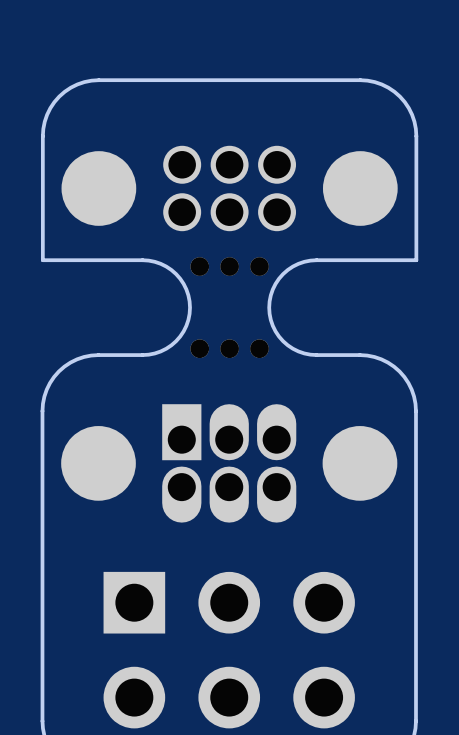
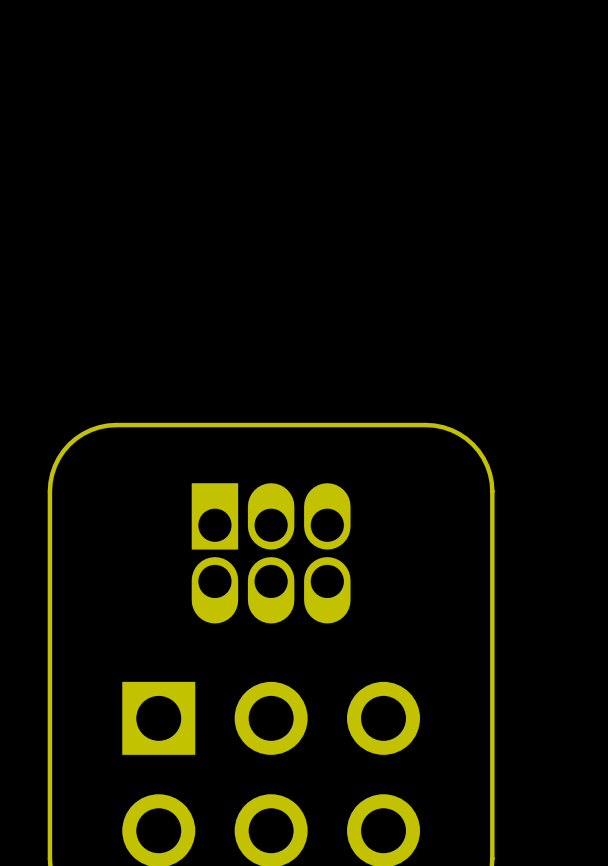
part: (98, 188) -> none
part: (229, 188) -> none
part: (360, 188) -> none
part: (229, 307) -> none
board edge: (316, 355) (304, 353) (287, 345) (279, 336) (272, 325) (269, 313) (269, 301) (275, 283) (283, 274) (292, 266) (310, 260) (416, 260) (416, 136) (414, 121) (408, 108) (399, 96) (388, 87) (374, 82) (360, 80) (98, 80) (77, 84) (64, 91) (54, 102) (47, 114) (43, 128) (42, 260) (154, 261) (171, 270) (180, 278) (186, 289) (189, 301) (189, 313) (183, 331) (176, 341) (166, 348) (154, 353) (142, 355) -> (374, 425) (168, 425)
part: (98, 463) -> none
part: (359, 463) -> none

